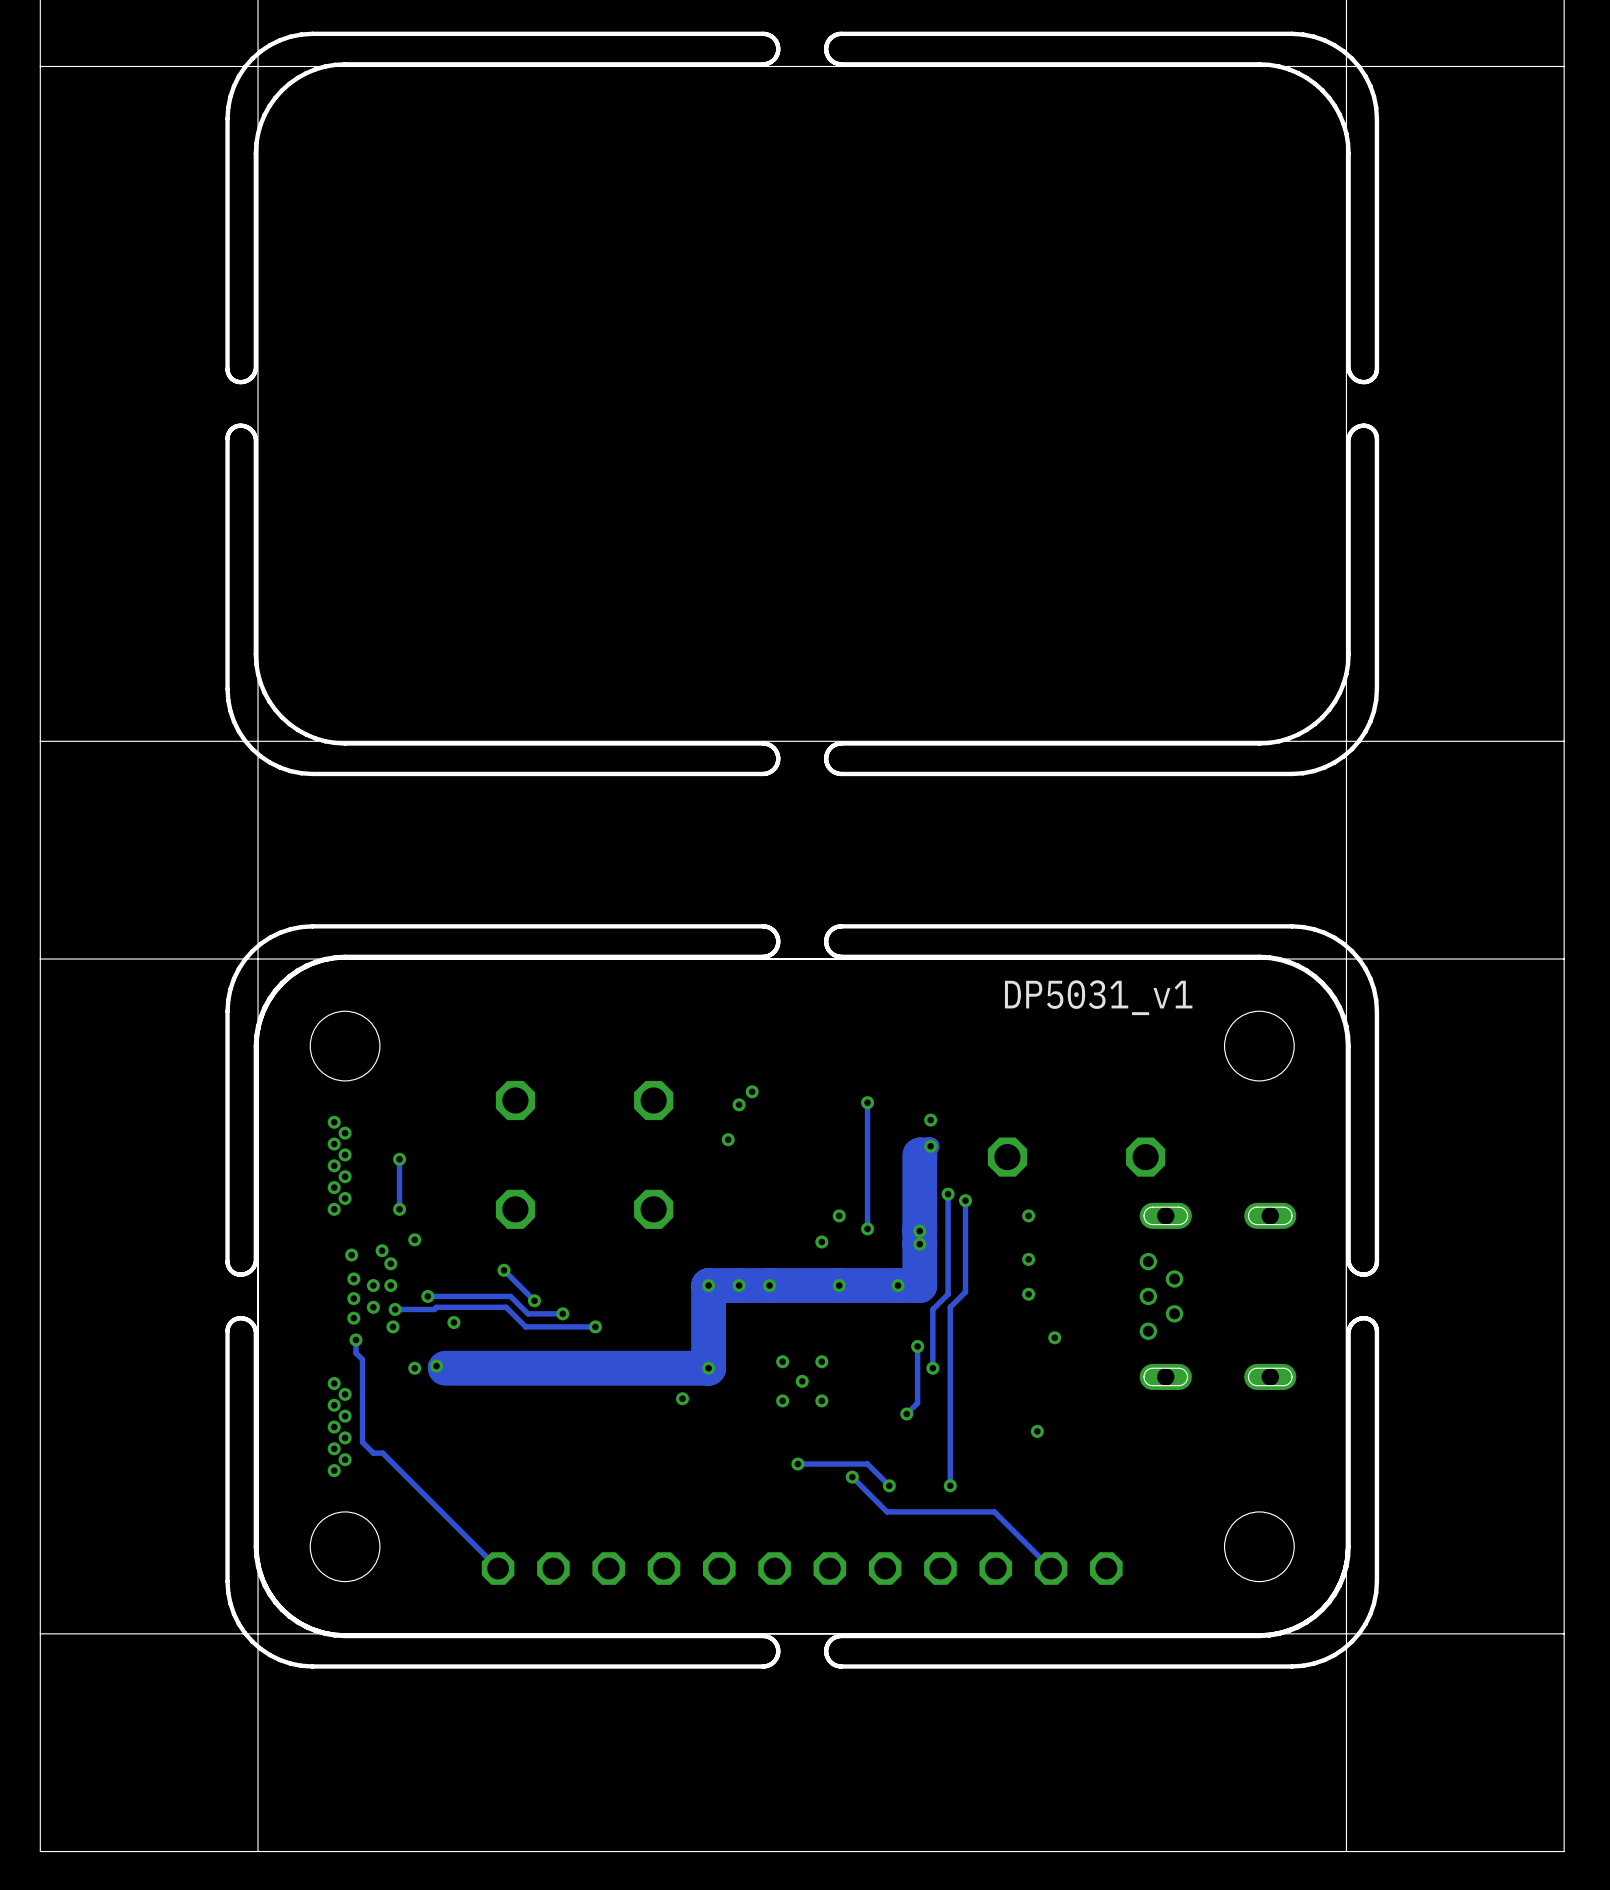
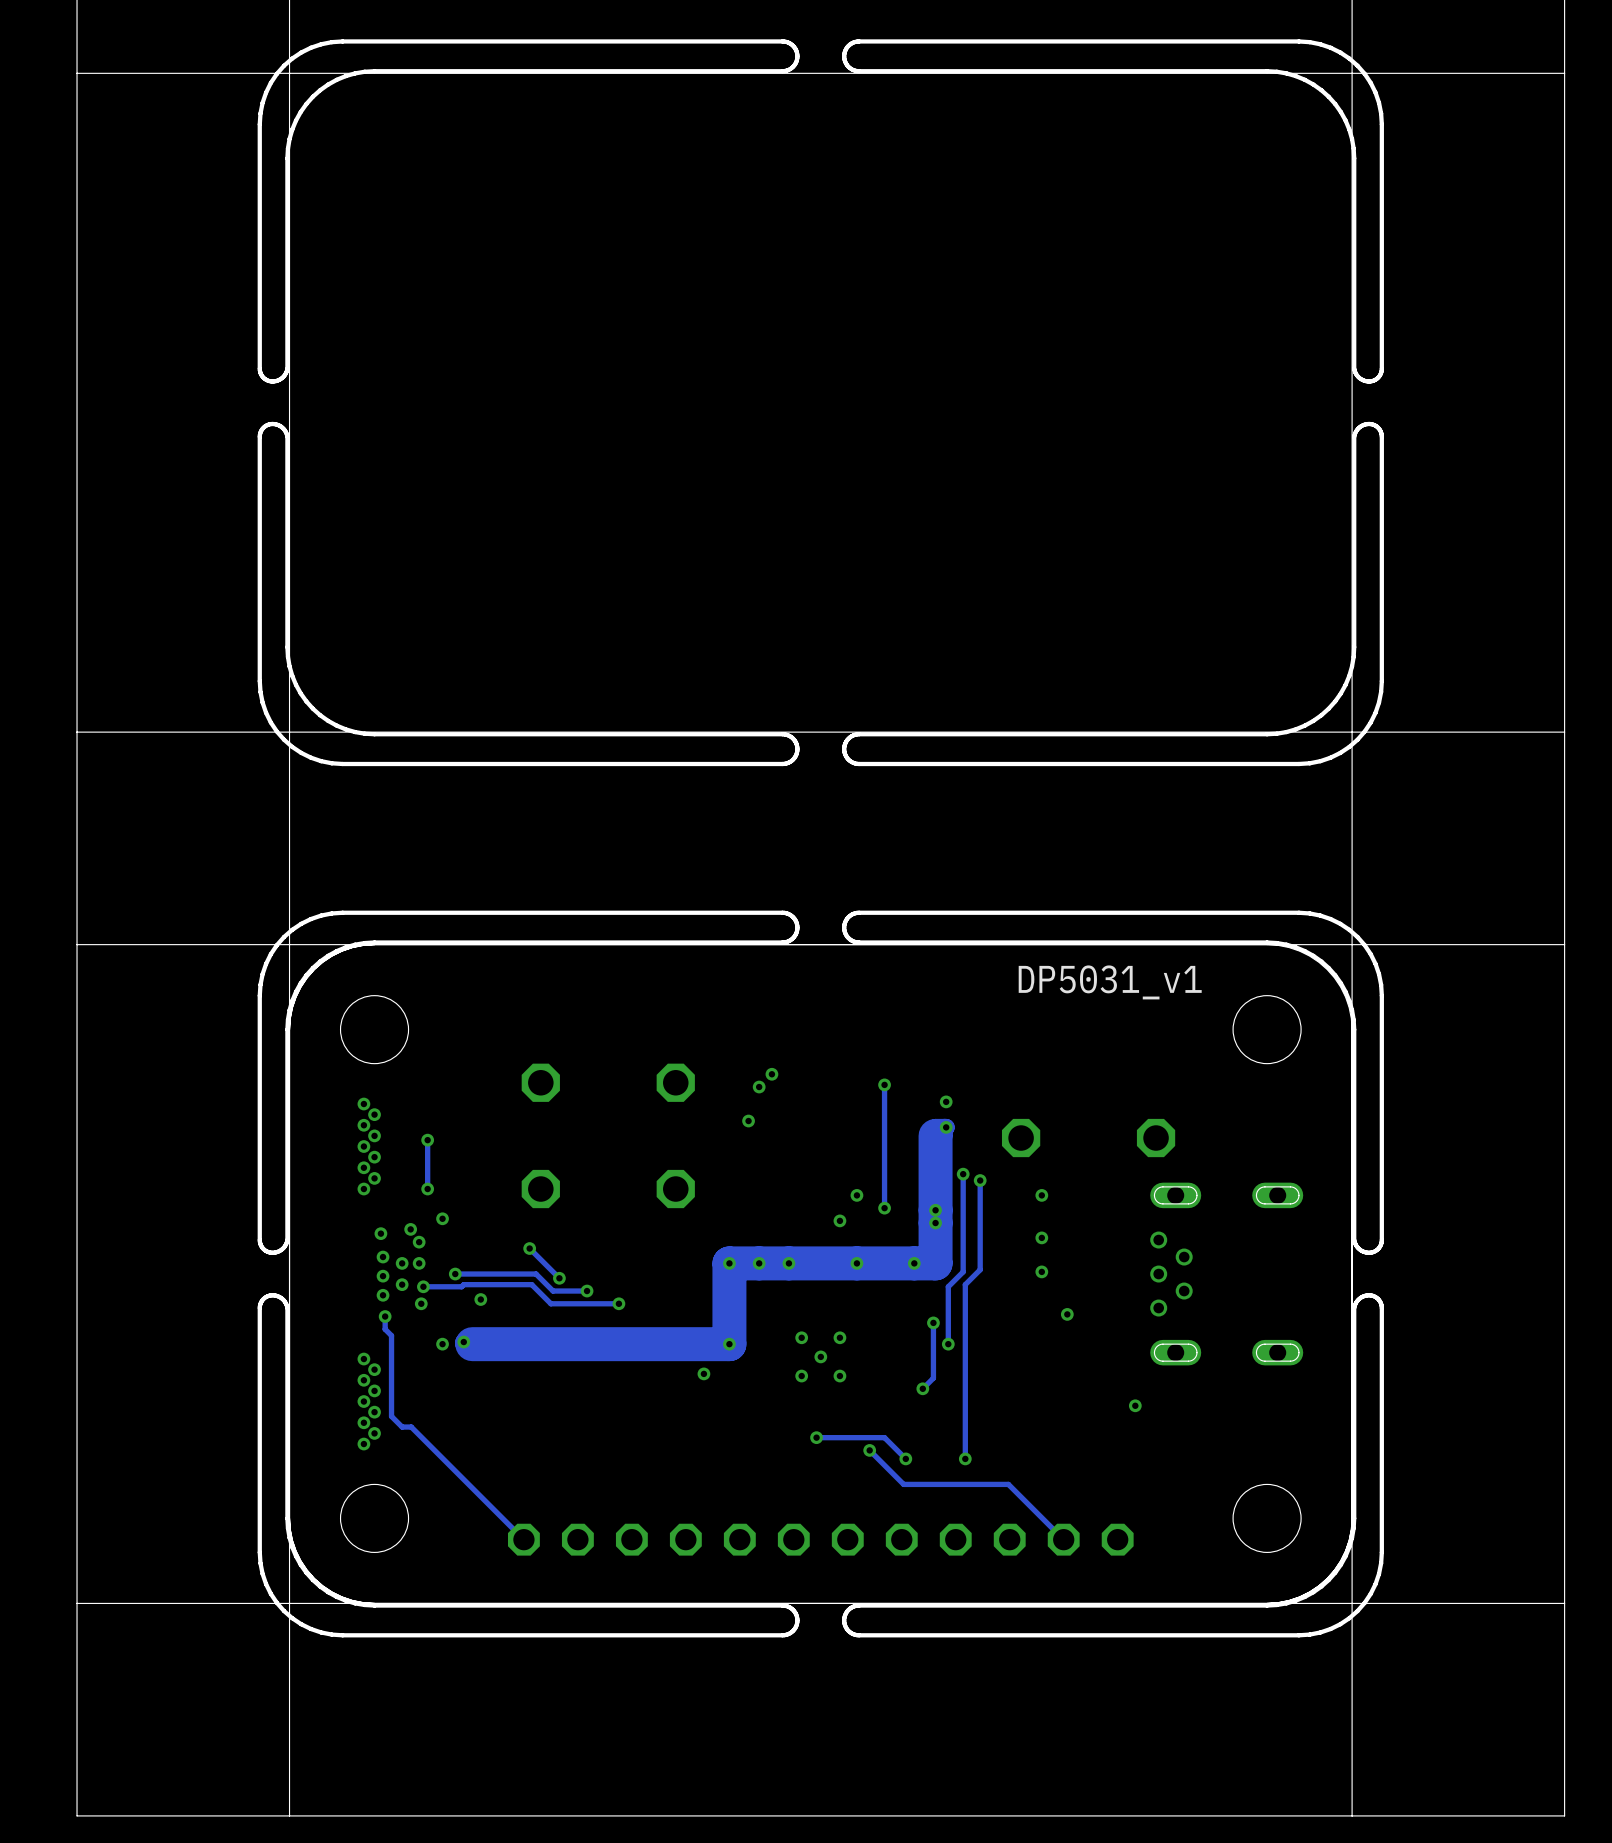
via position: (1037, 1431) -> (1135, 1405)

